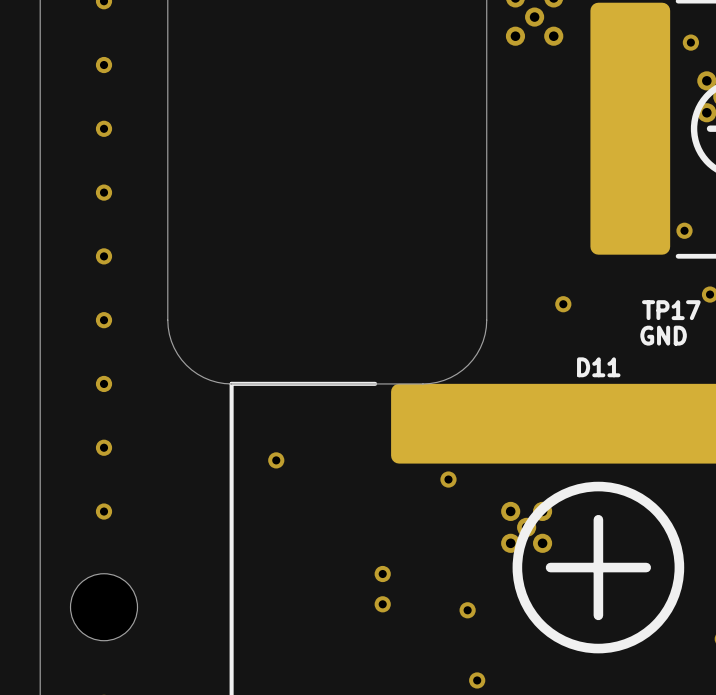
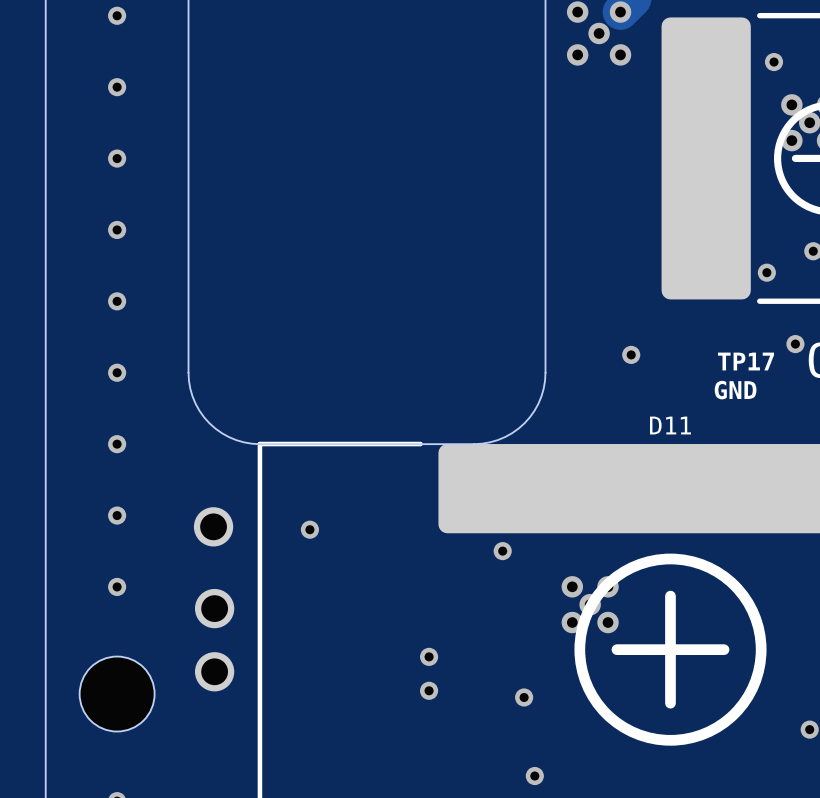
part: none -> (213, 526)
part: none -> (214, 608)
part: none -> (214, 671)

